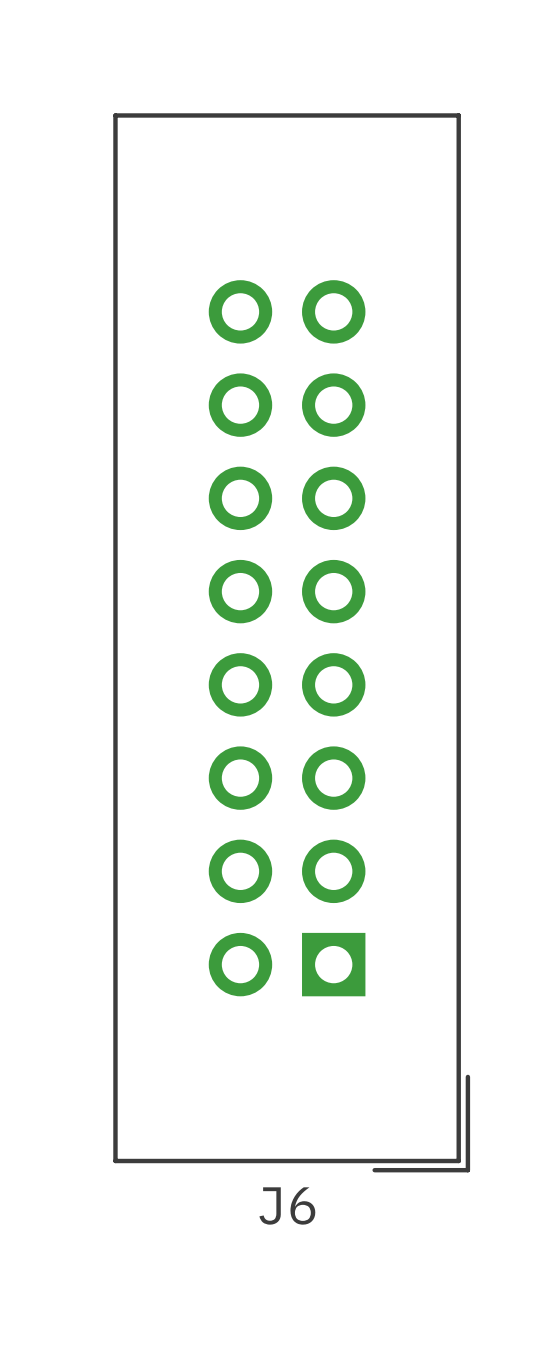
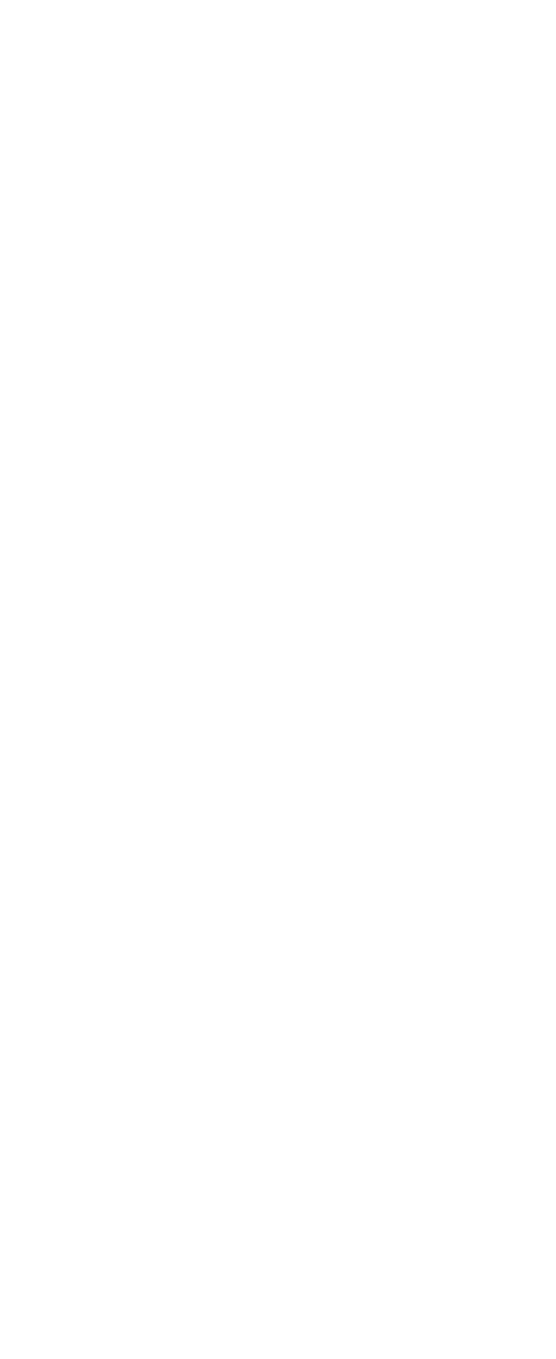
J6: (291, 642) -> none

